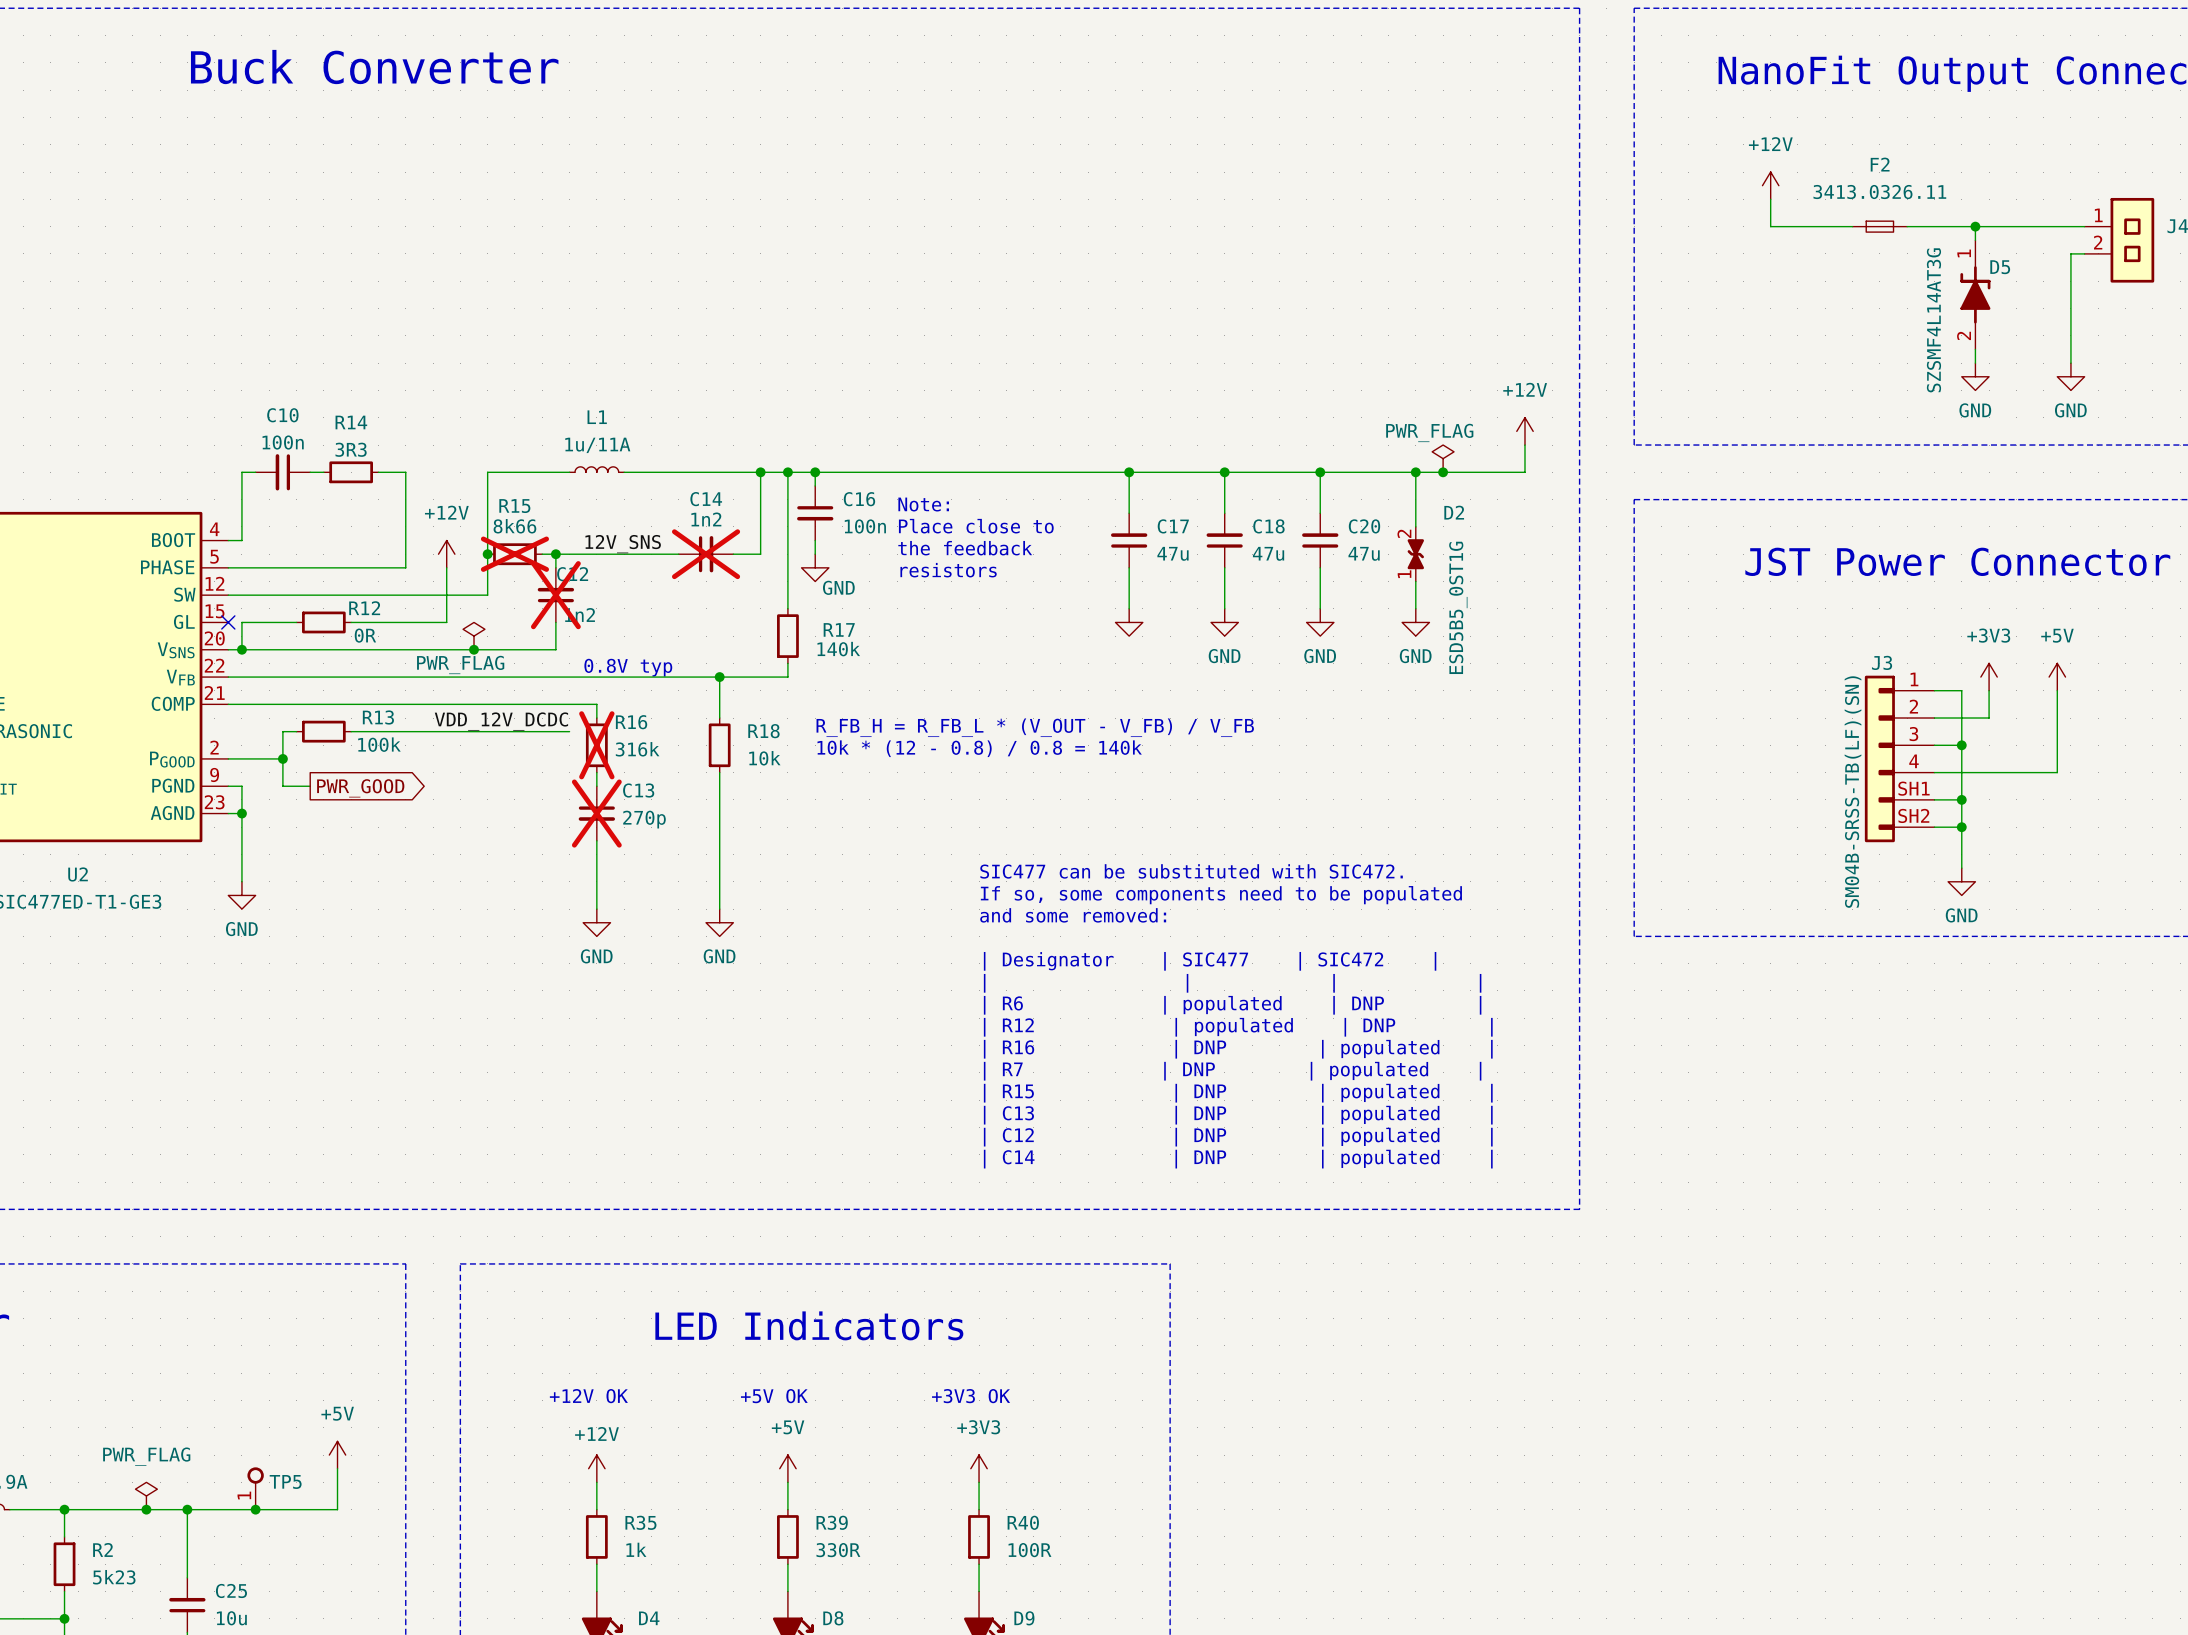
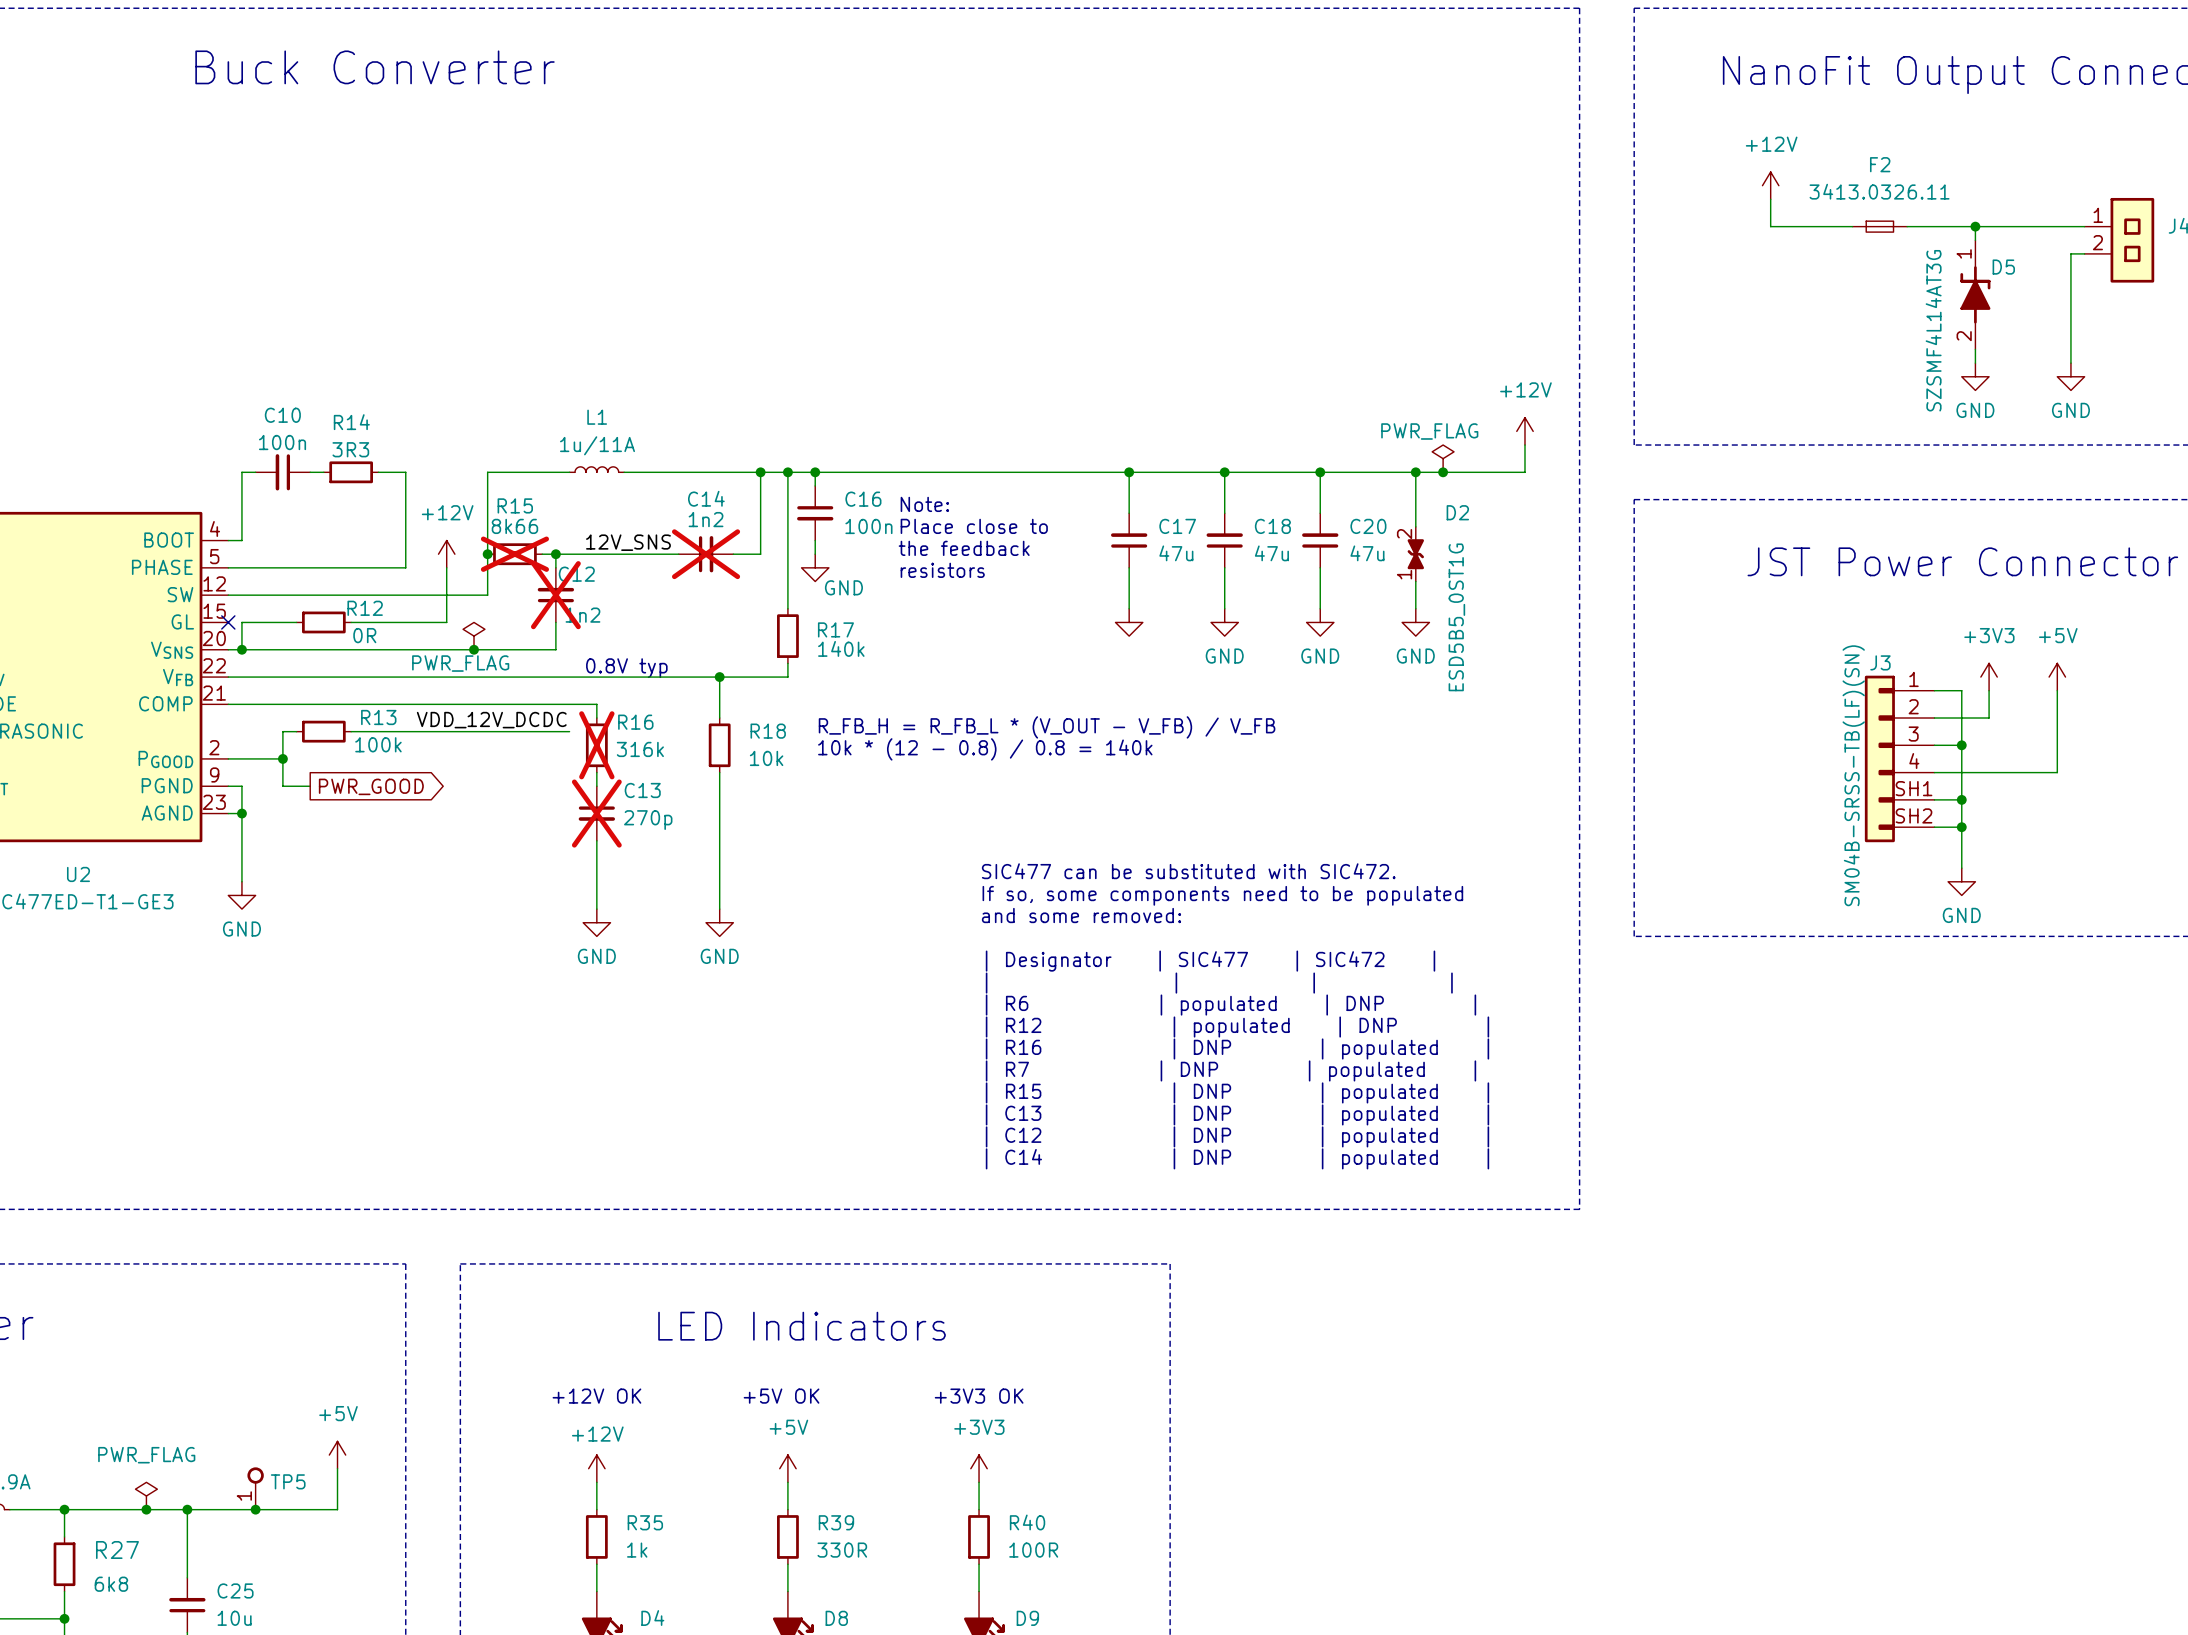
R2 name: R2 (102, 1549) -> R27 (117, 1549)
R2 text: 5k23 (114, 1577) -> 6k8 (111, 1584)

